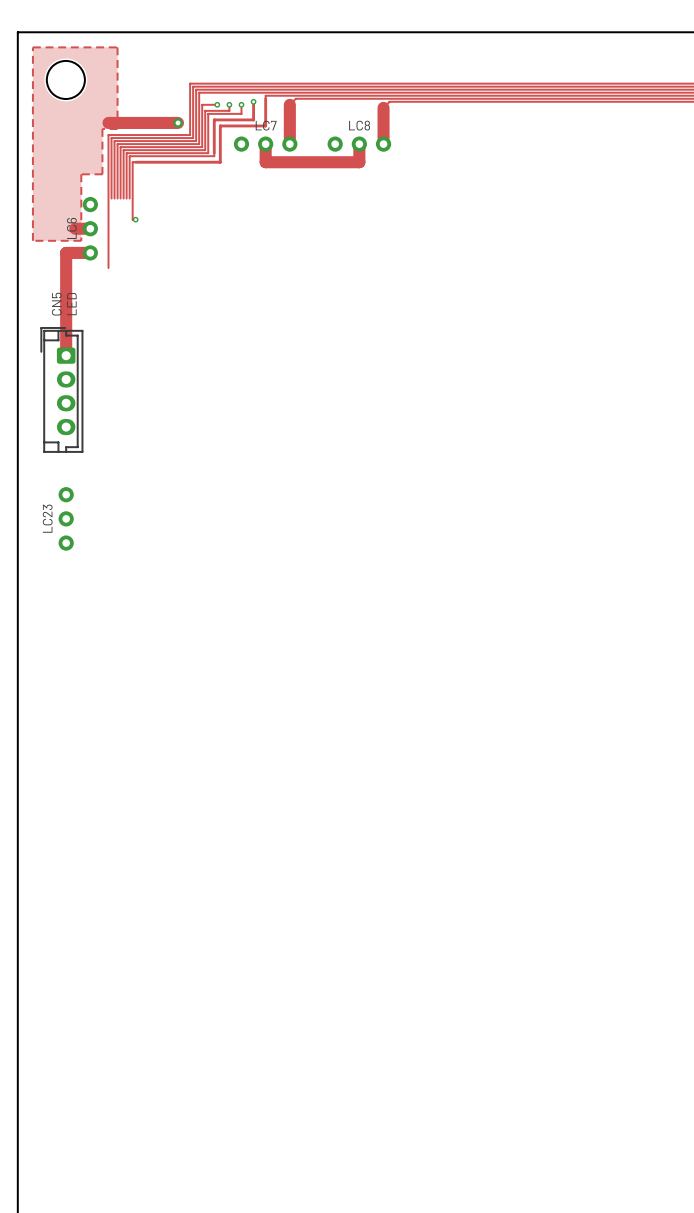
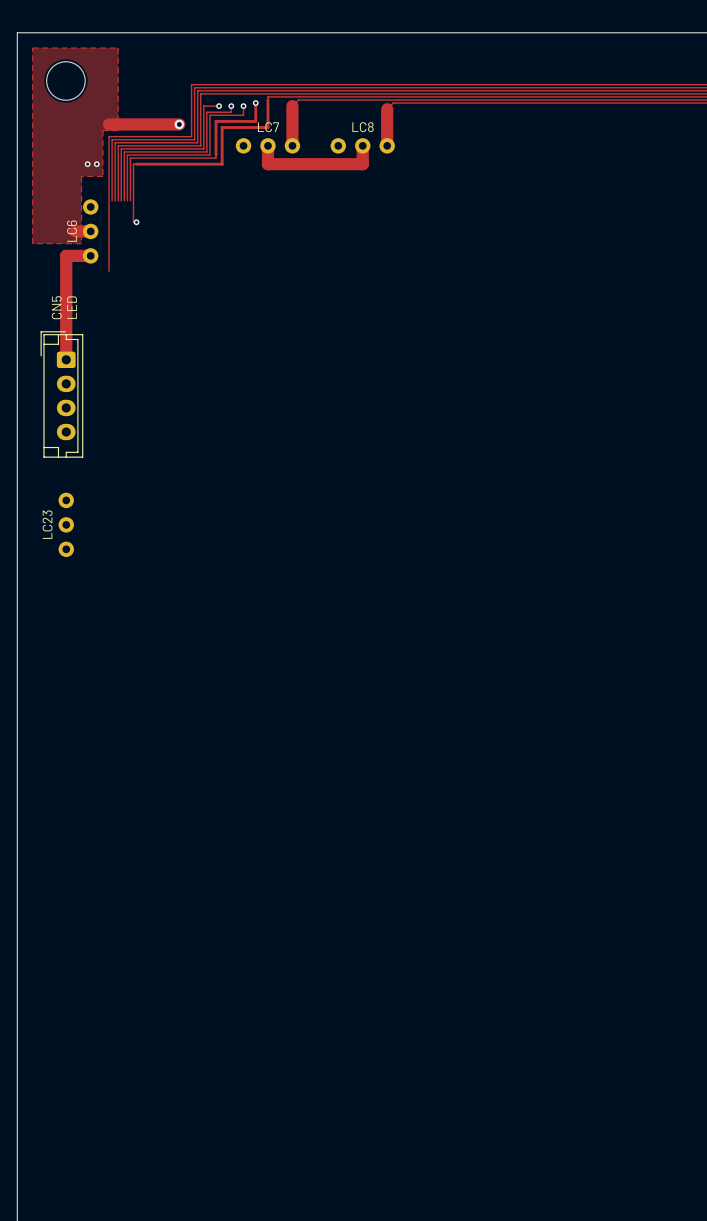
via: none -> (87, 164)
via: none -> (96, 164)

